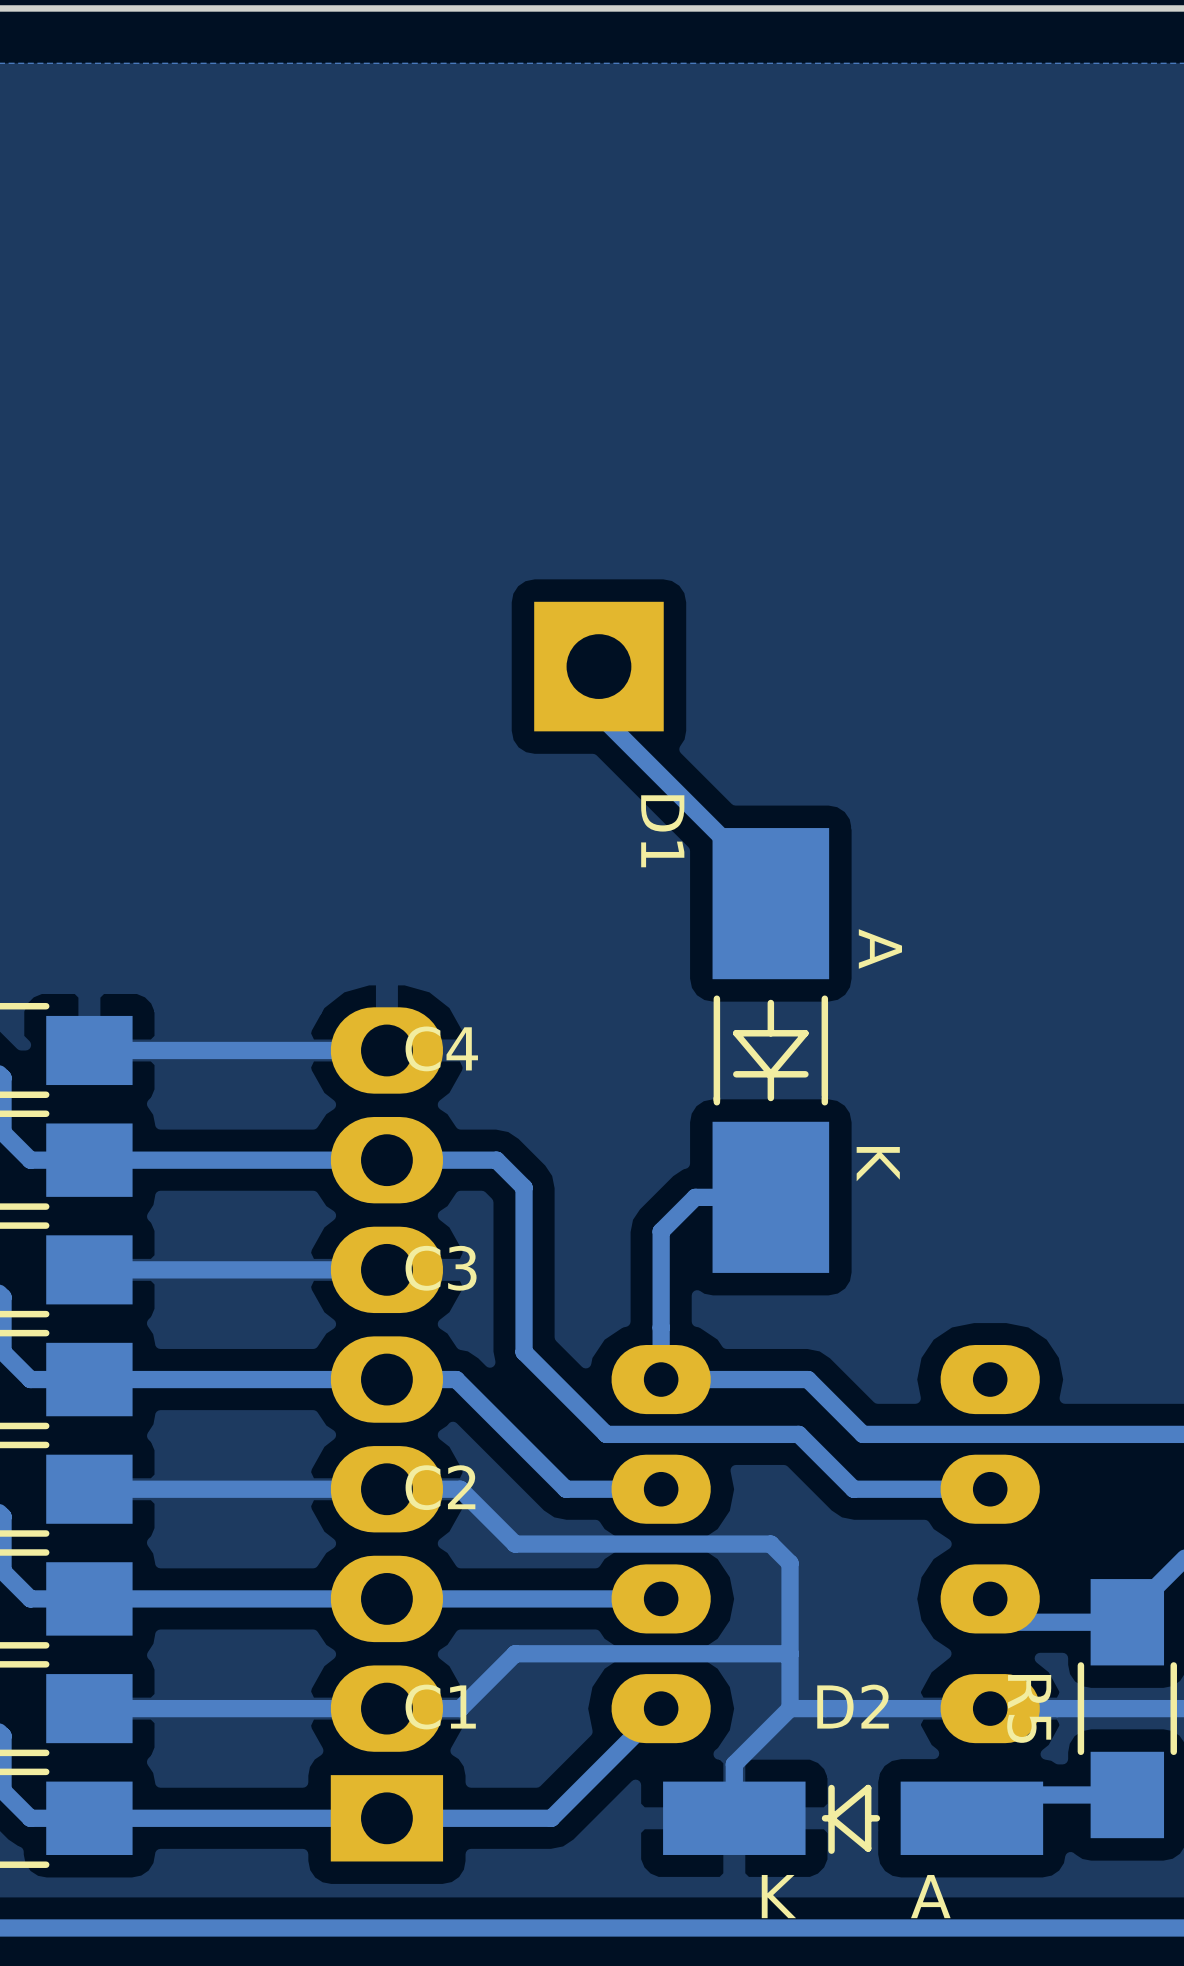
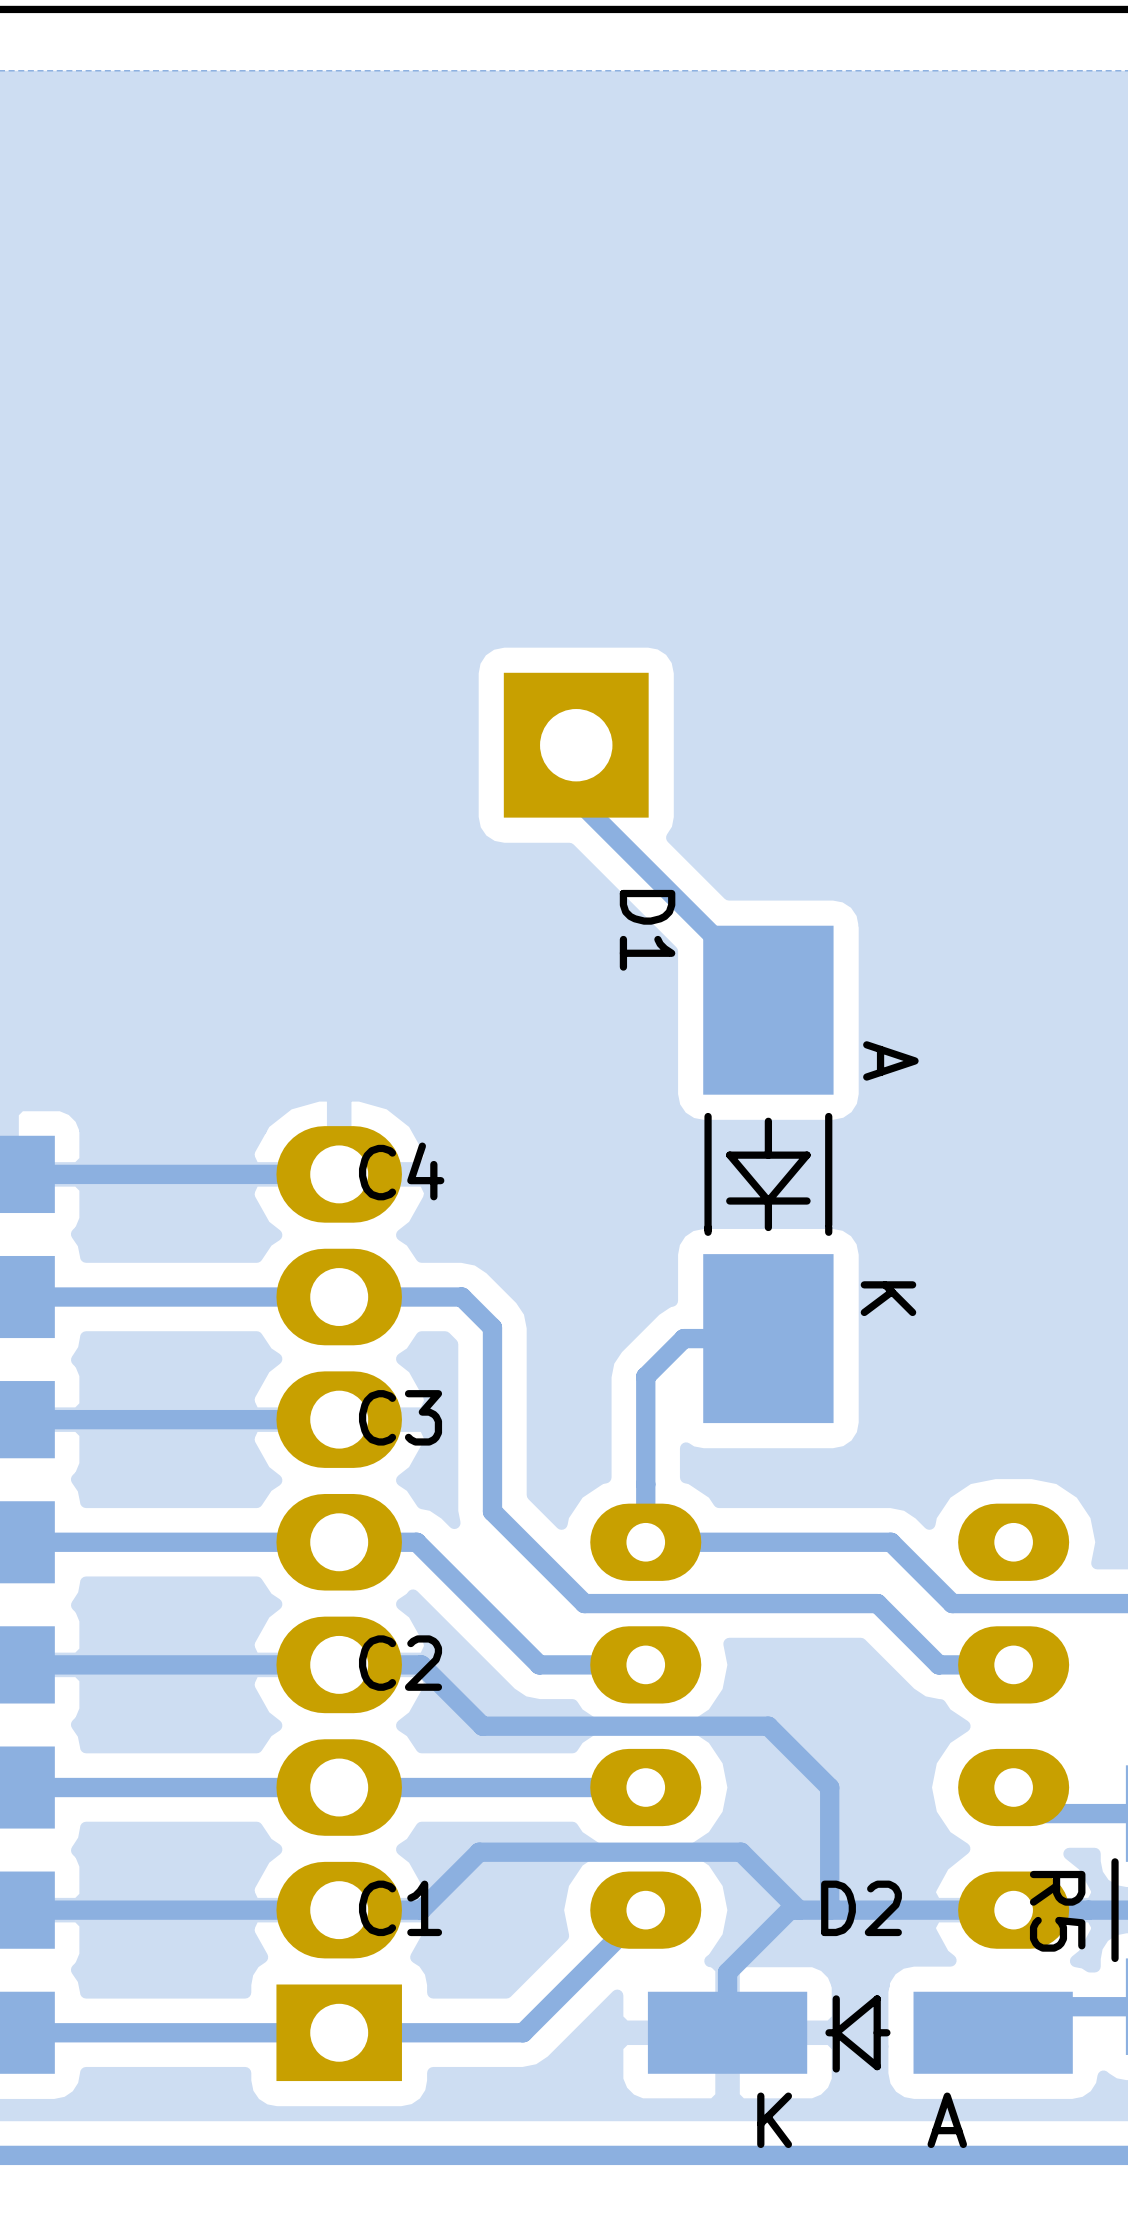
track: (808, 1379) (862, 1434) -> (799, 1603) (871, 1603)
track: none -> (809, 1542) (891, 1542) (952, 1603)
track: (798, 1434) (853, 1489) (923, 1489) -> none
track: (935, 1434) (868, 1434) -> (938, 1664) (877, 1603)
track: (790, 1563) (790, 1708) -> (789, 1747) (829, 1787) (829, 1910)
track: (790, 1653) (515, 1653) (512, 1656) -> (799, 1910) (741, 1852) (479, 1852)

